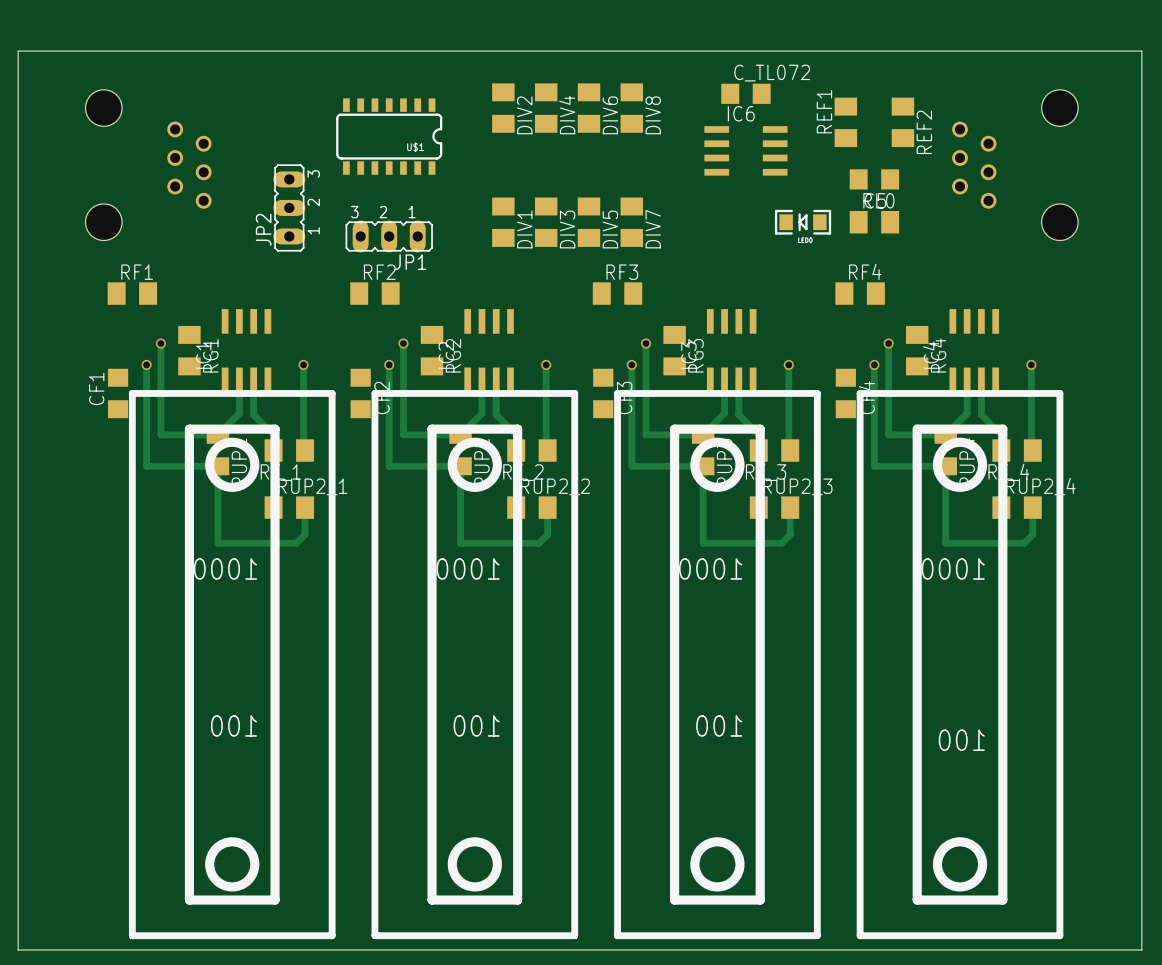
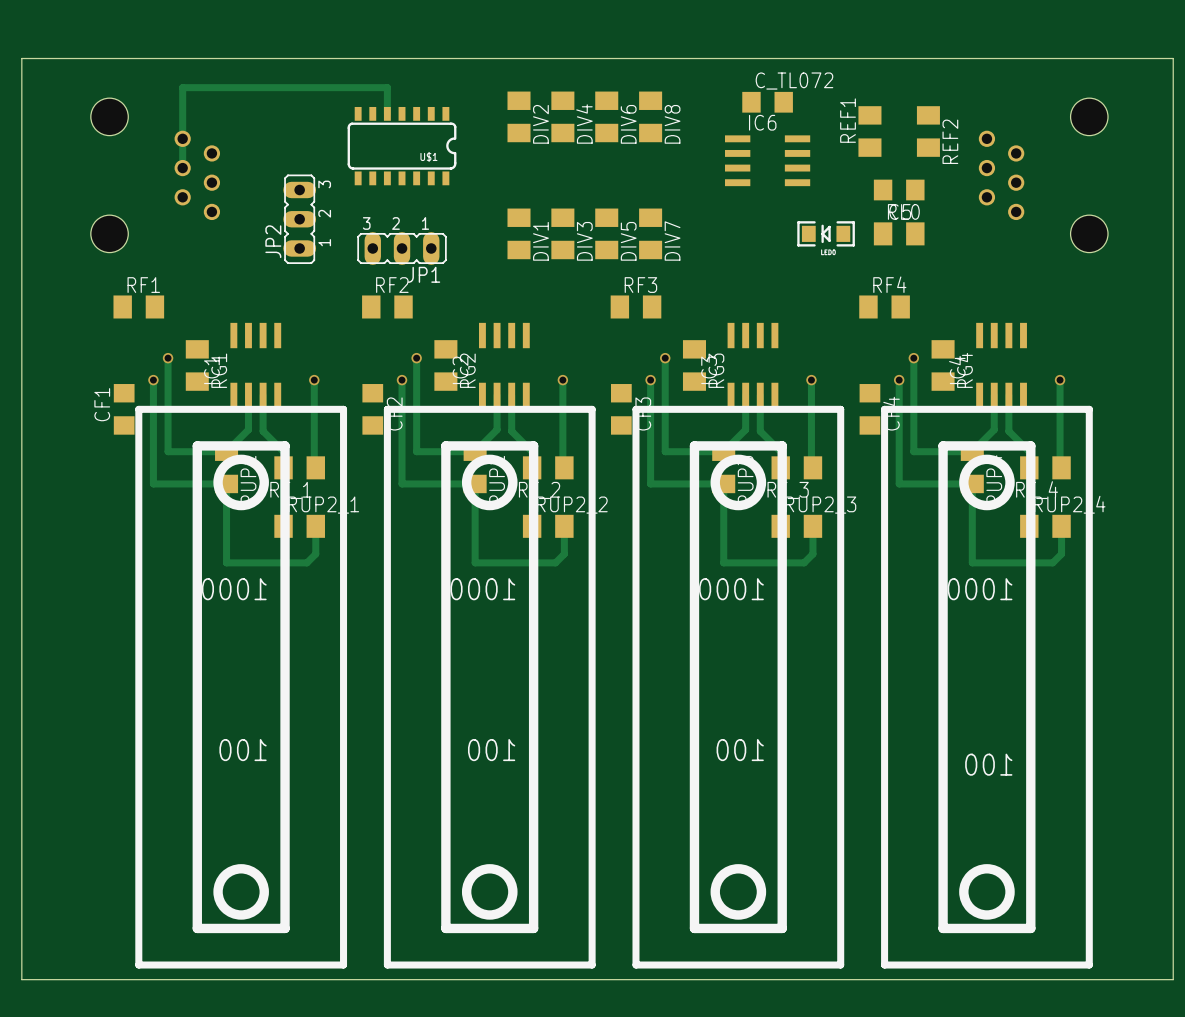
track: none -> (387, 113) (387, 87) (182, 87) (182, 168)

